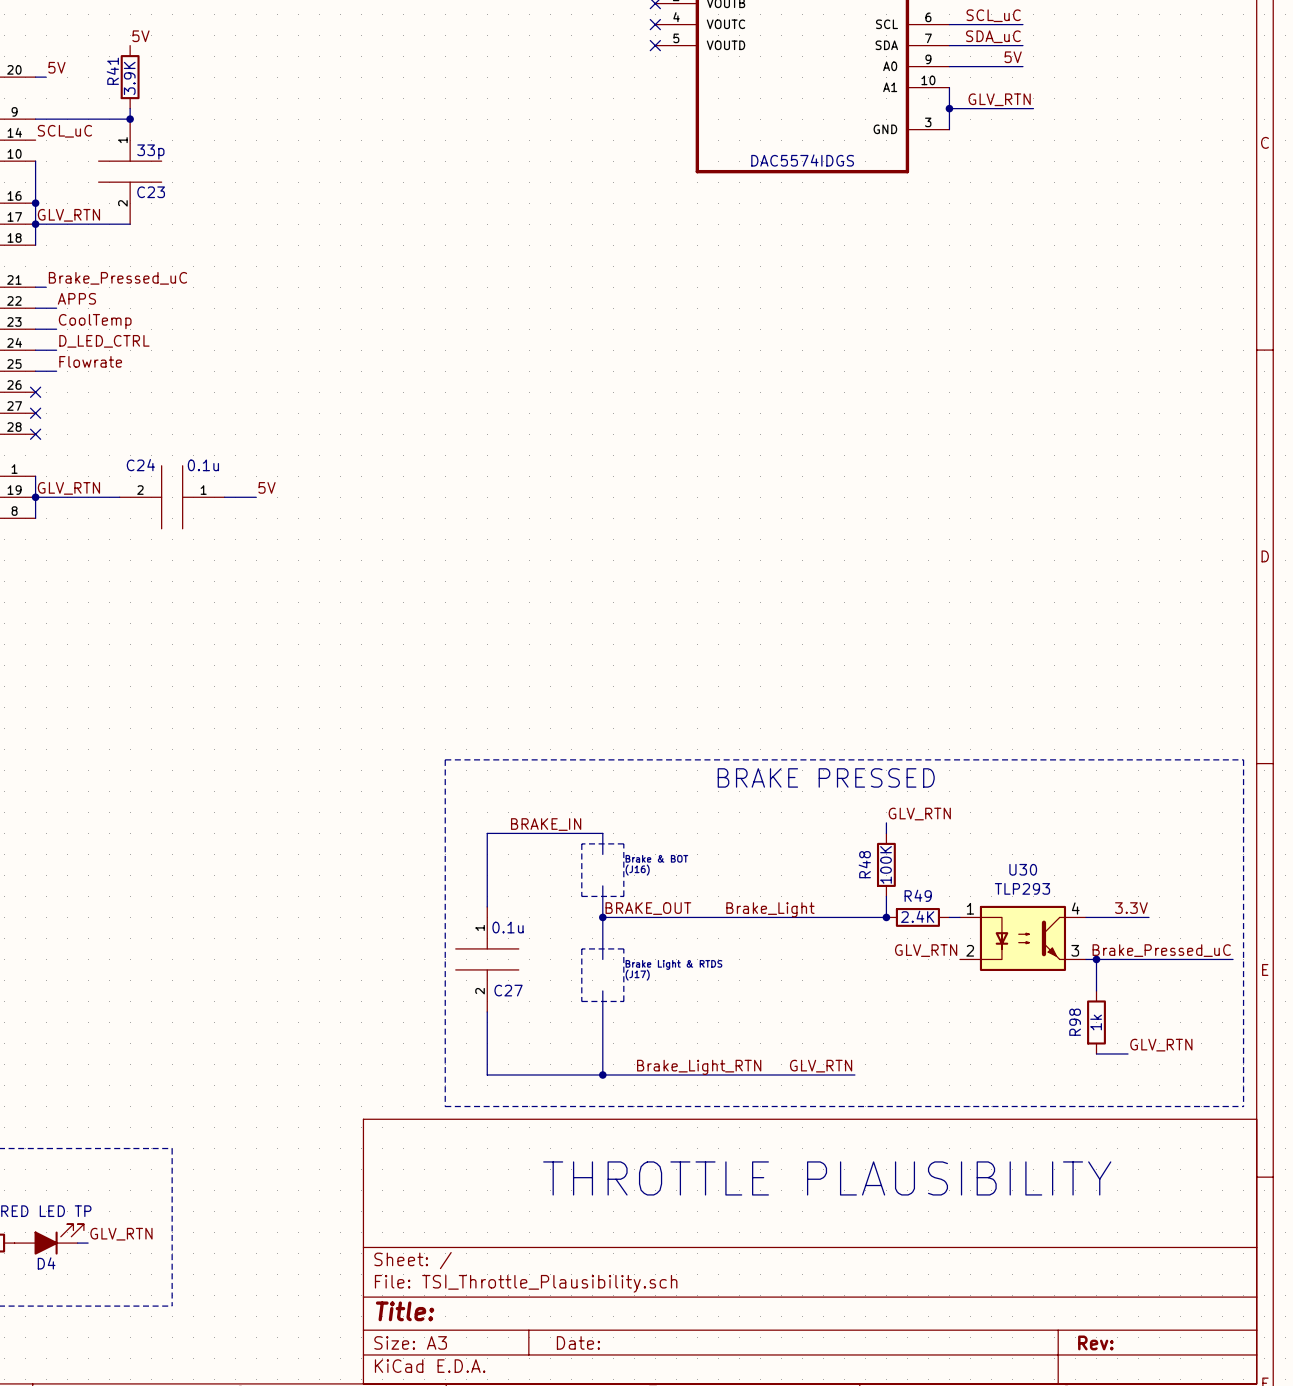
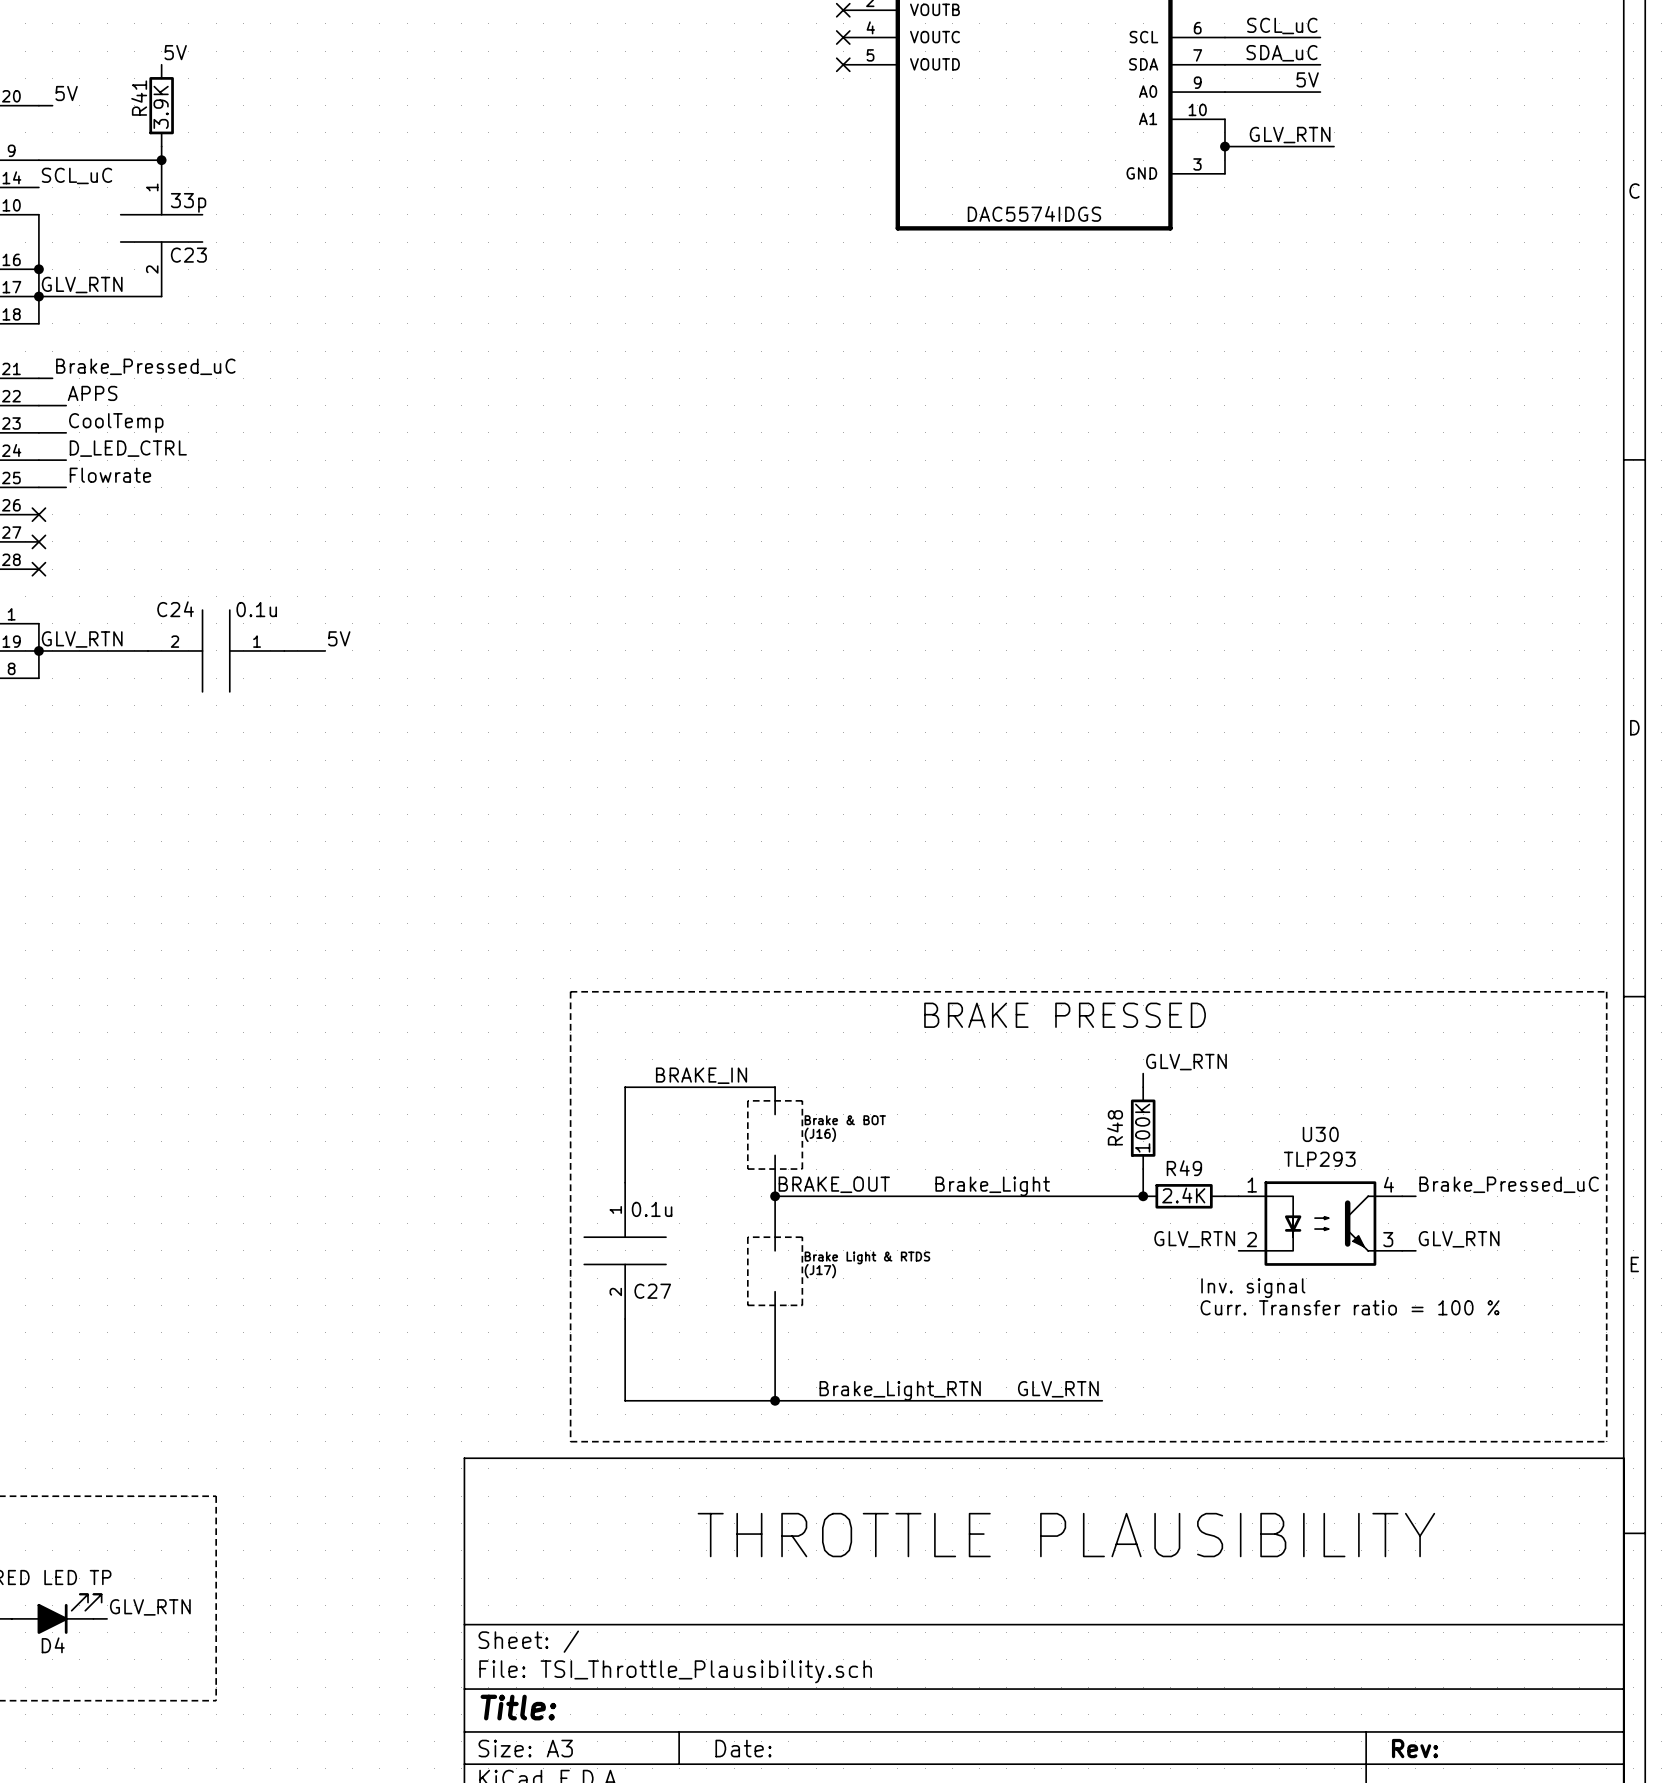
label: 3.3V (1131, 908) -> none
wire: (1096, 917) (1149, 917) -> none
label position: Brake_Pressed_uC (1161, 950) -> Brake_Pressed_uC (1509, 1184)
junction: (1096, 959) -> none
wire: (1233, 959) (1096, 959) (1096, 990) -> none
text: none -> Inv. signal (1253, 1288)
text: none -> Curr. Transfer ratio = 100 % (1350, 1307)
R98: 1k (1096, 1022) -> none
label position: GLV_RTN (1161, 1045) -> GLV_RTN (1459, 1239)
wire: (1096, 1053) (1128, 1053) -> none

